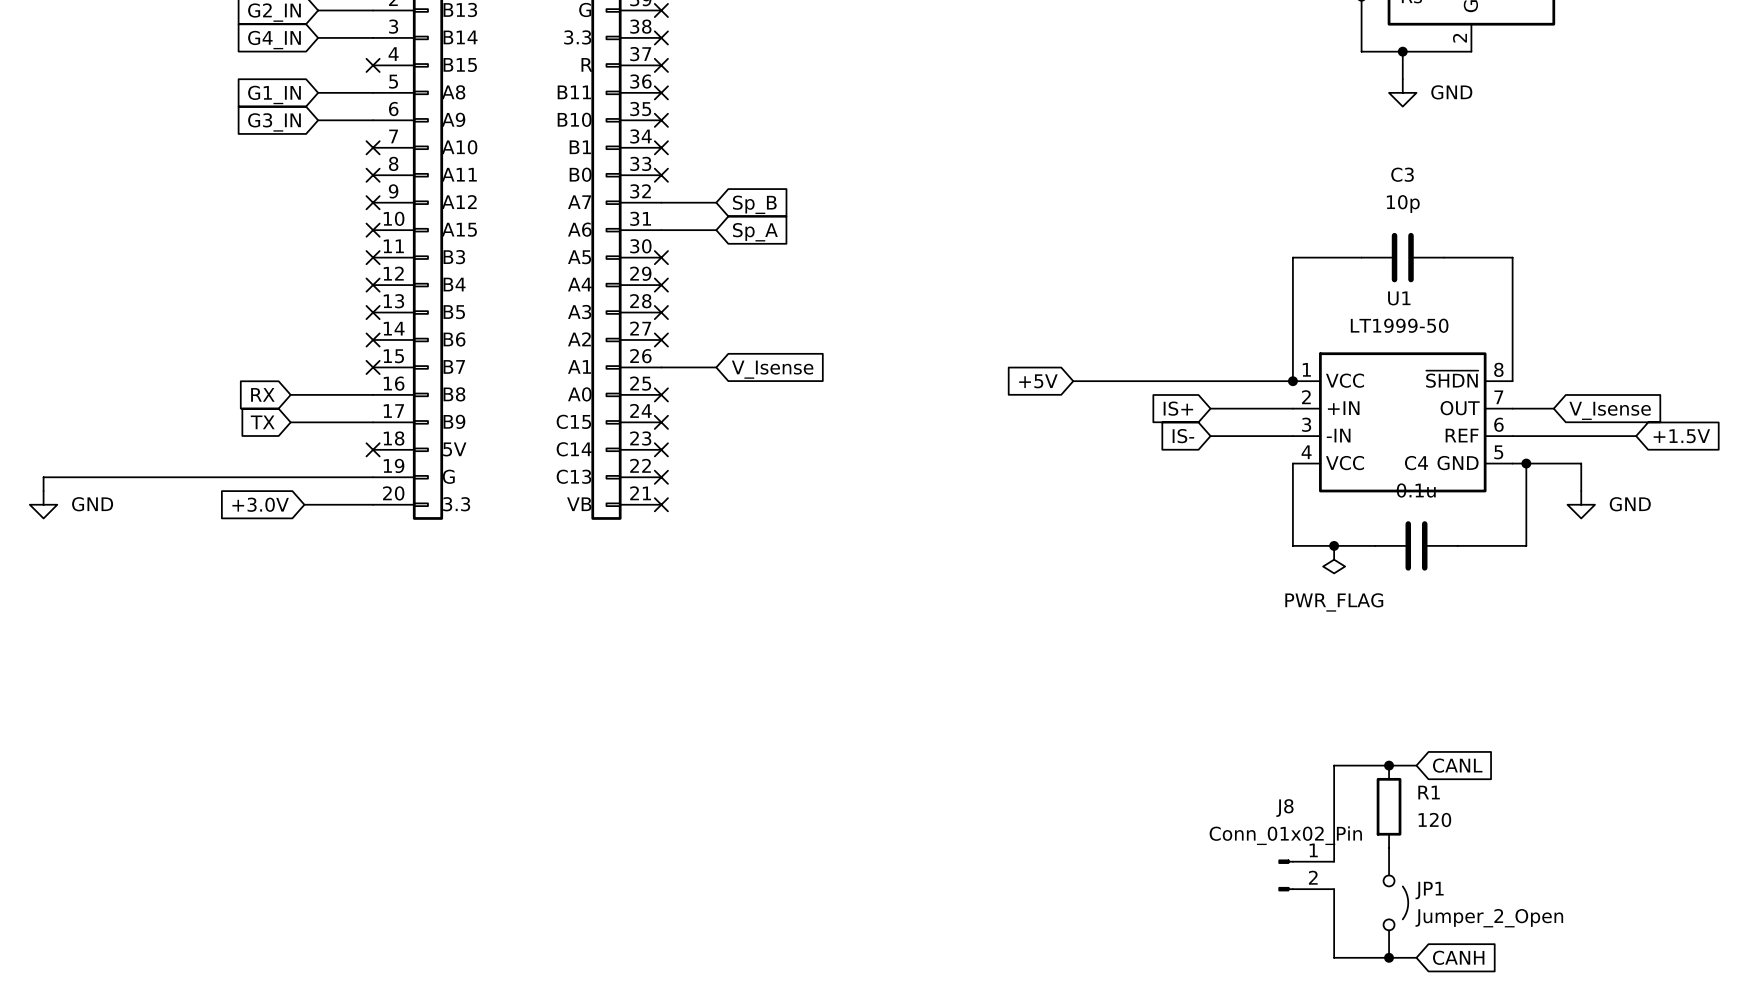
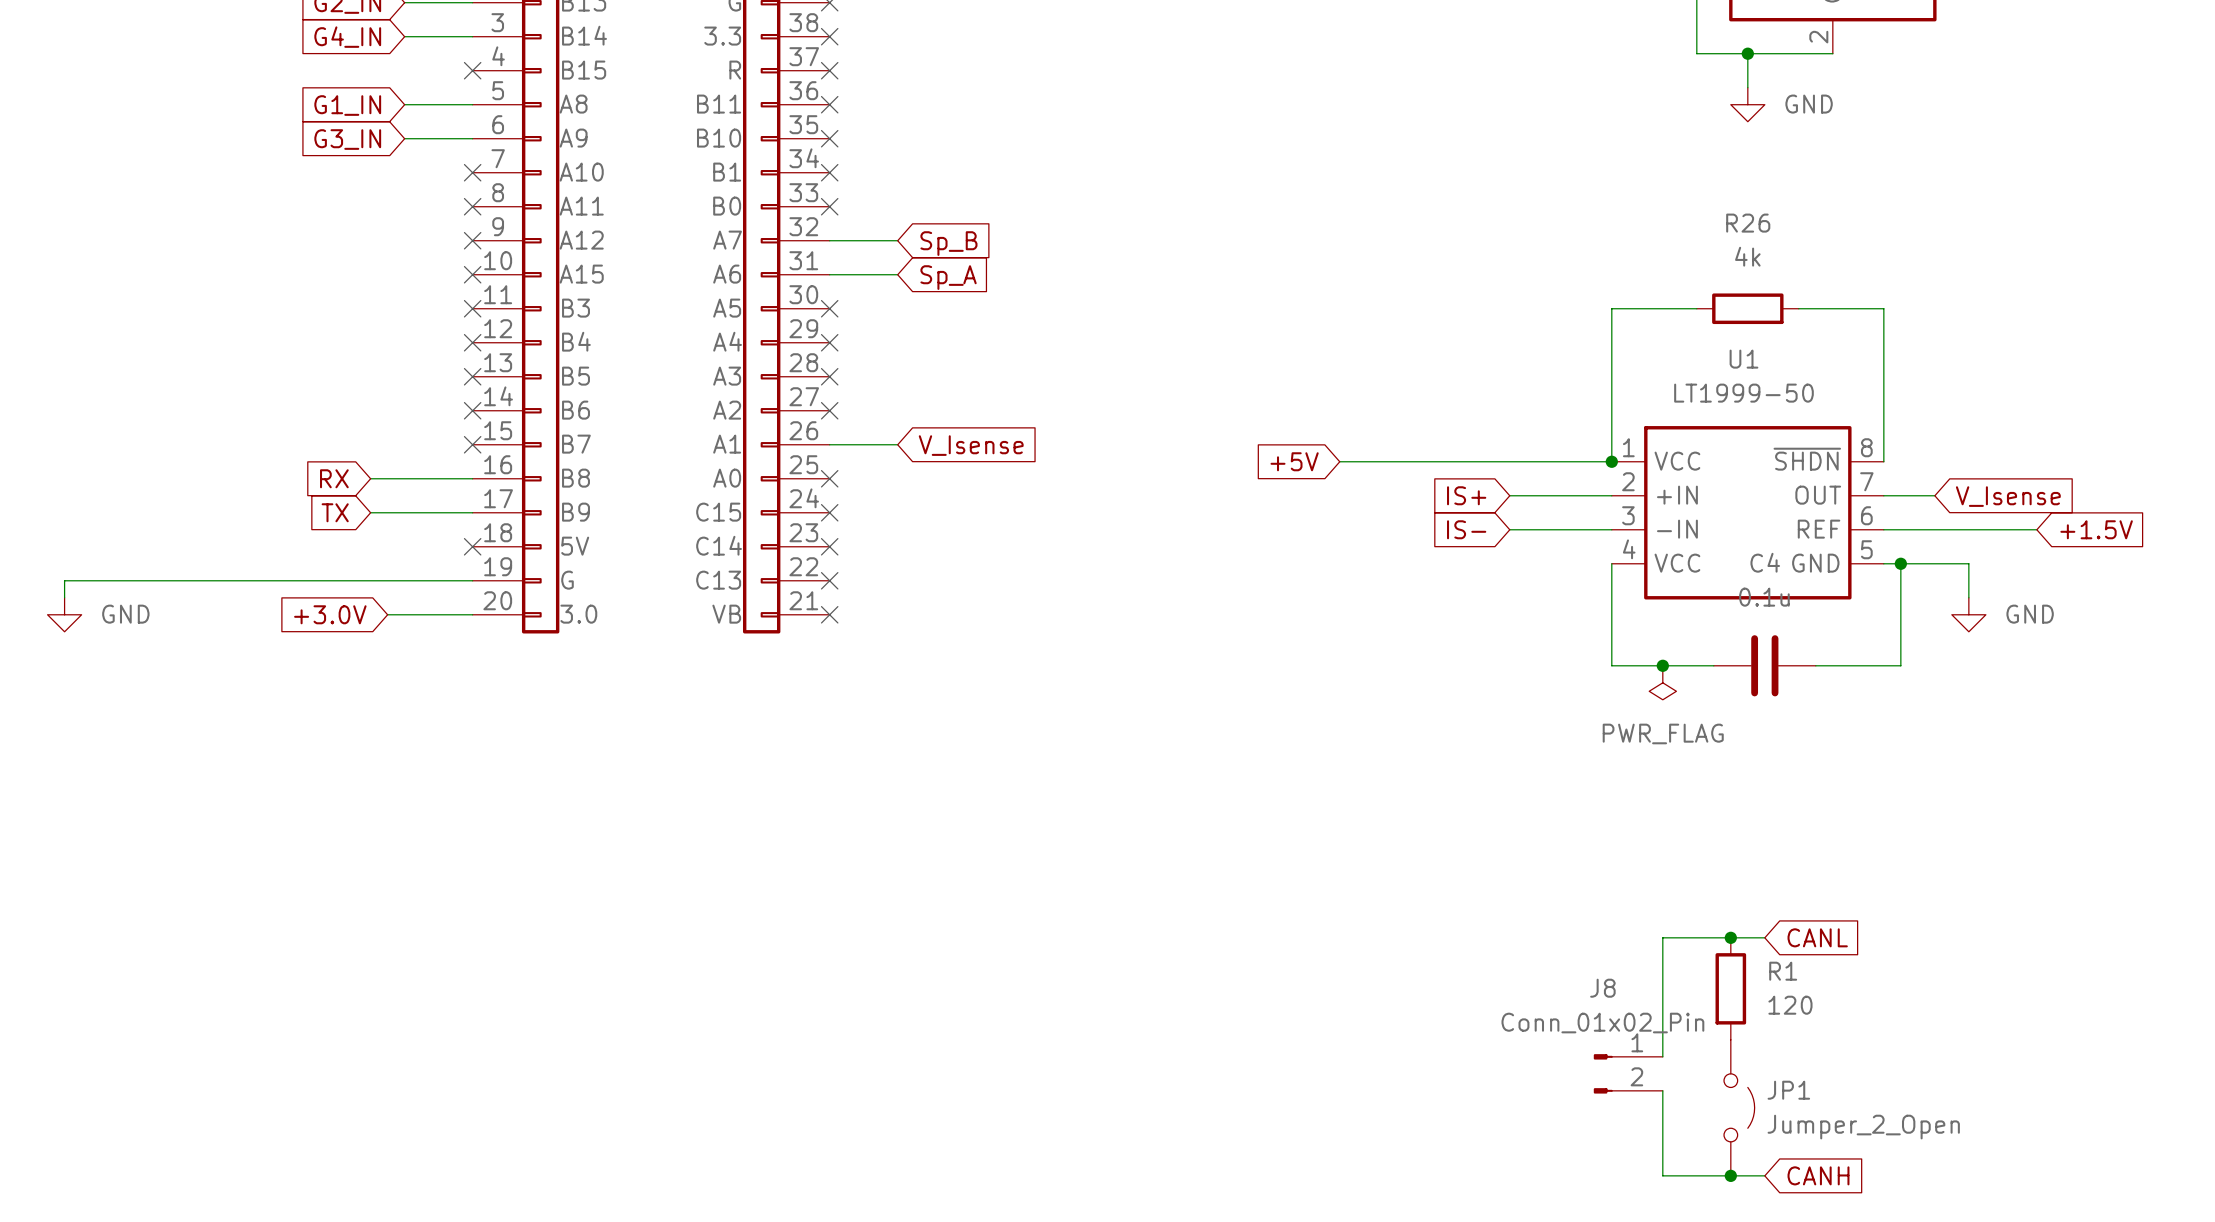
C3: 10p (1402, 257) -> none
R26: none -> 4k (1747, 308)
part pin name: 3.3 (456, 504) -> 3.0 (578, 614)

